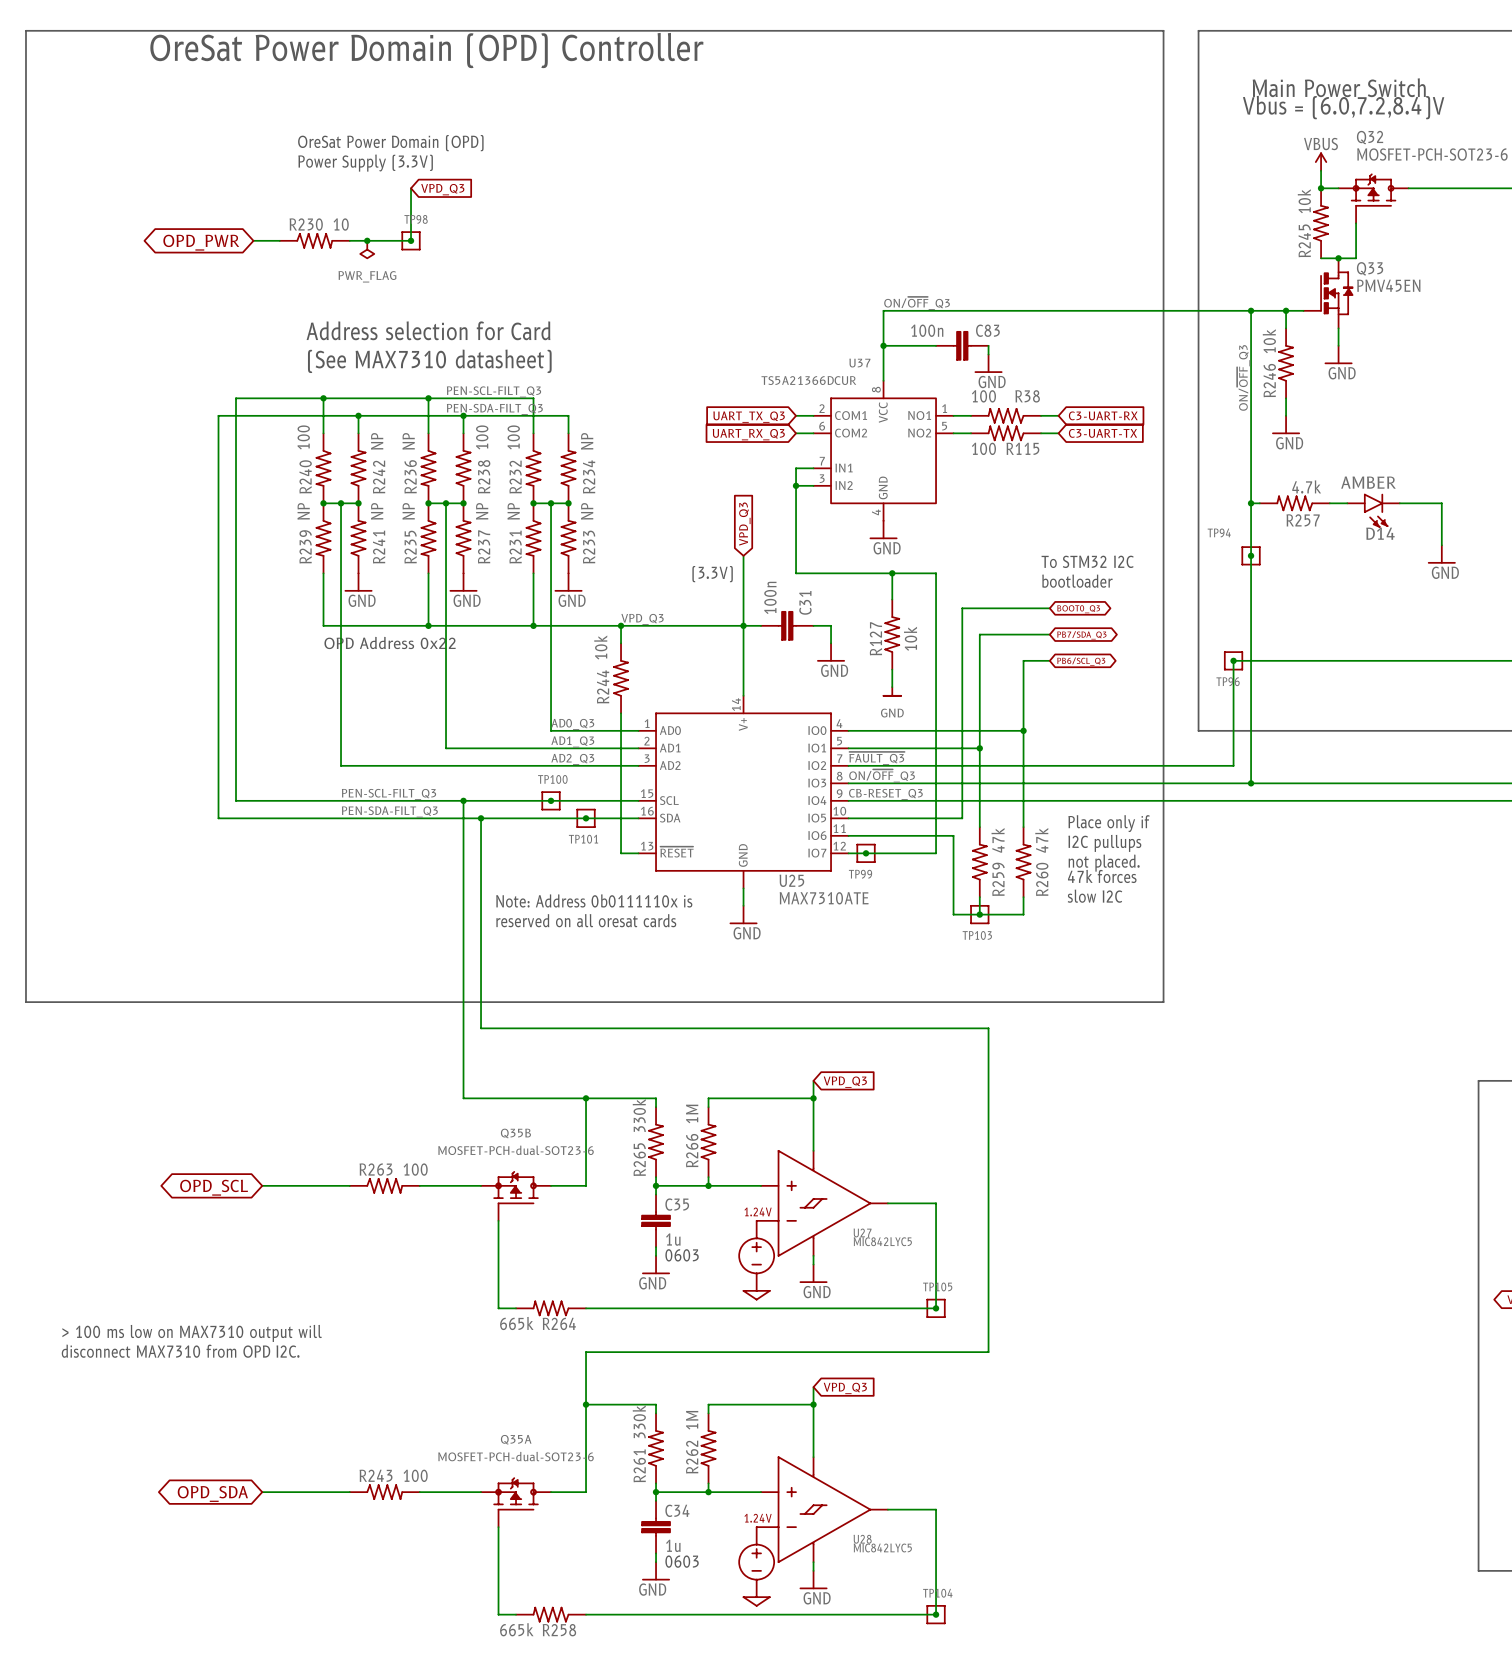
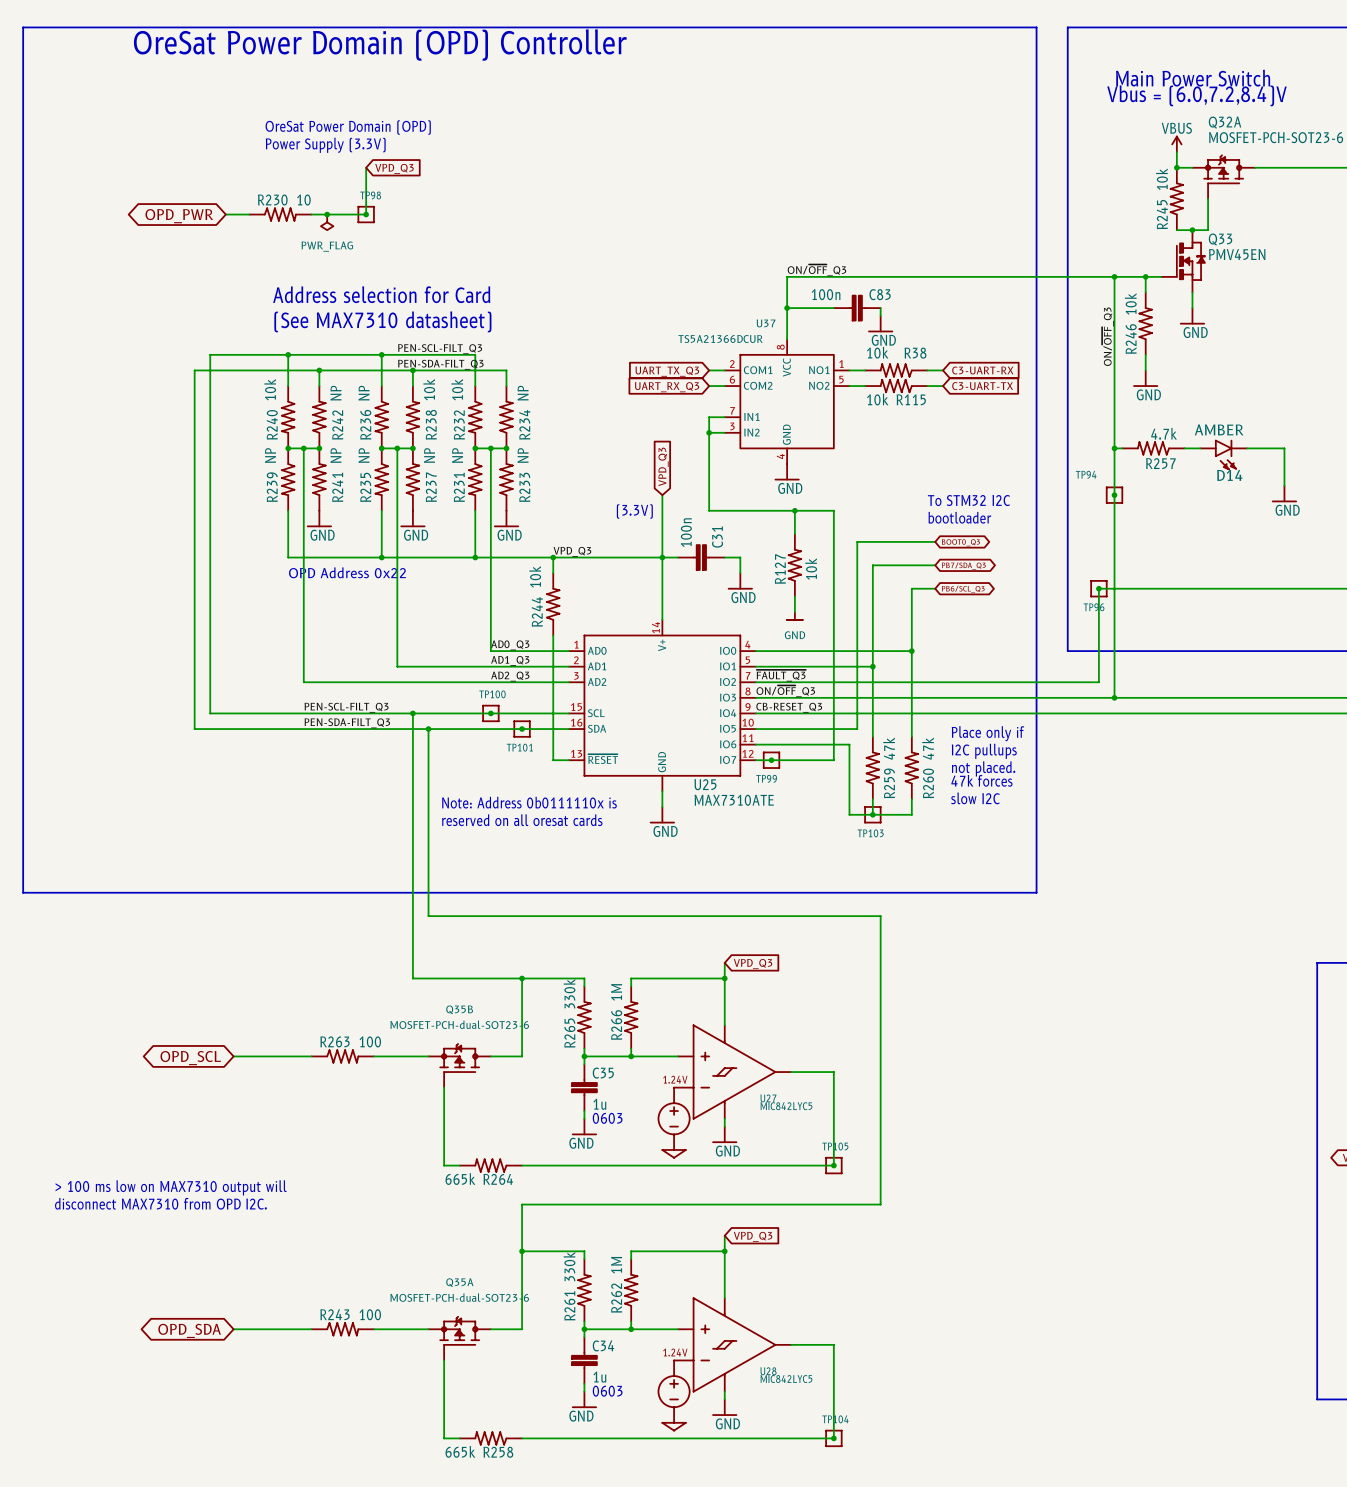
Q32 name: Q32 (1370, 137) -> Q32A (1225, 122)
R38 value: 100 (983, 396) -> 10k (877, 352)
R240 value: 100 (303, 437) -> 10k (270, 389)
R238 value: 100 (482, 437) -> 10k (429, 389)
R232 value: 100 (513, 437) -> 10k (457, 389)
R115 value: 100 (983, 448) -> 10k (877, 399)

